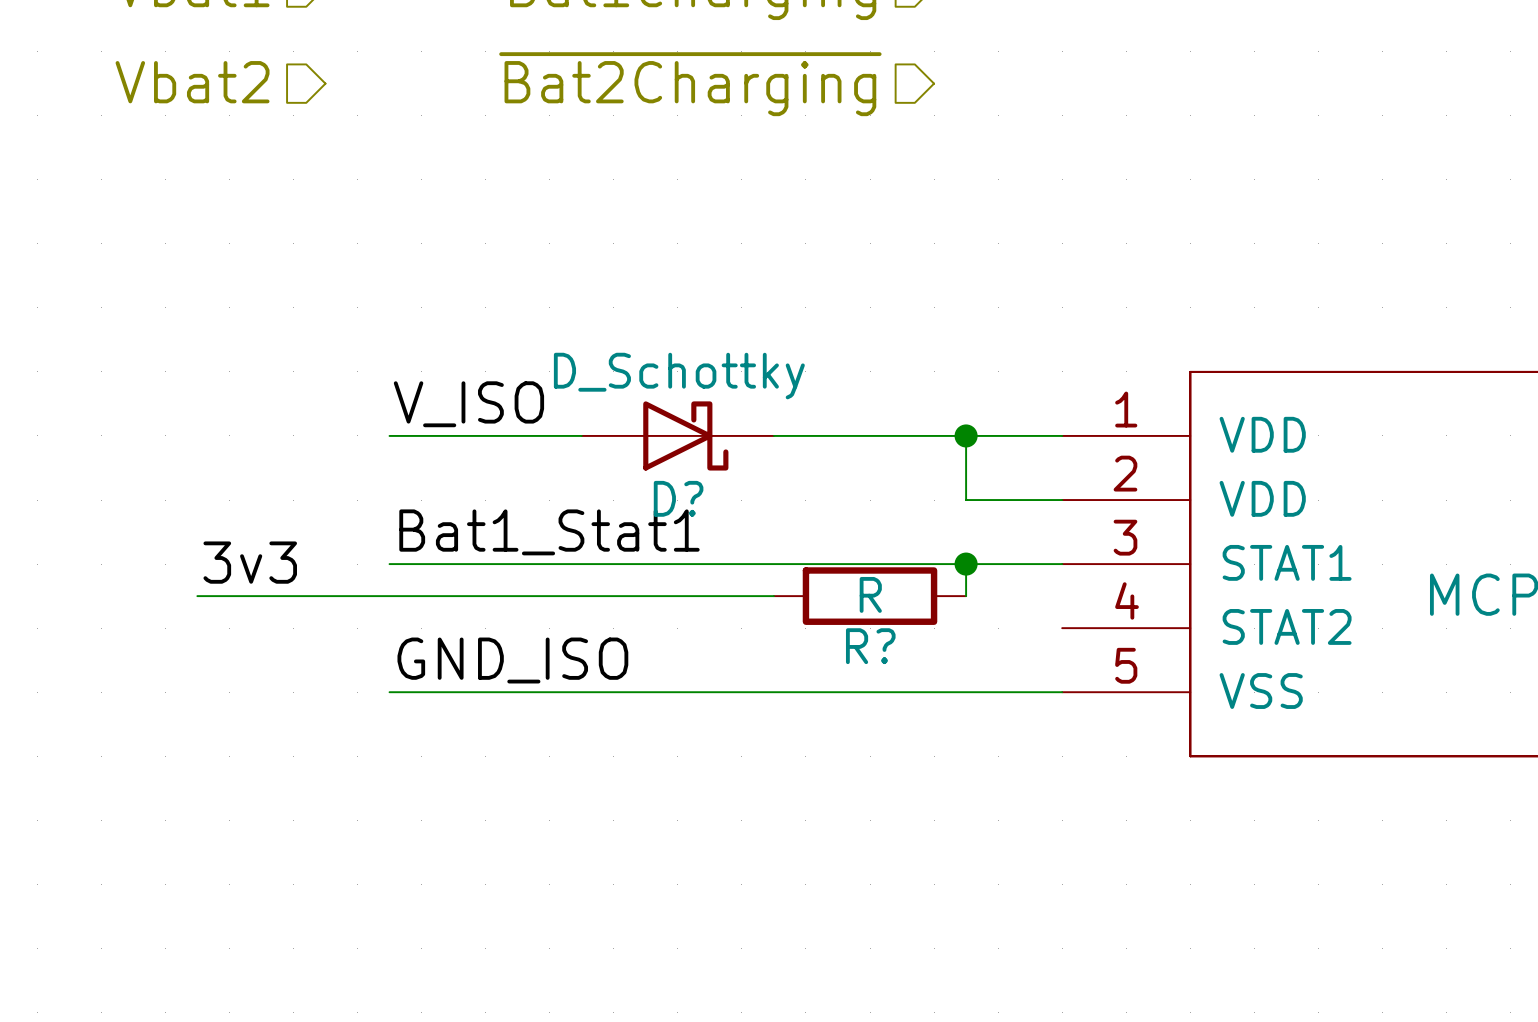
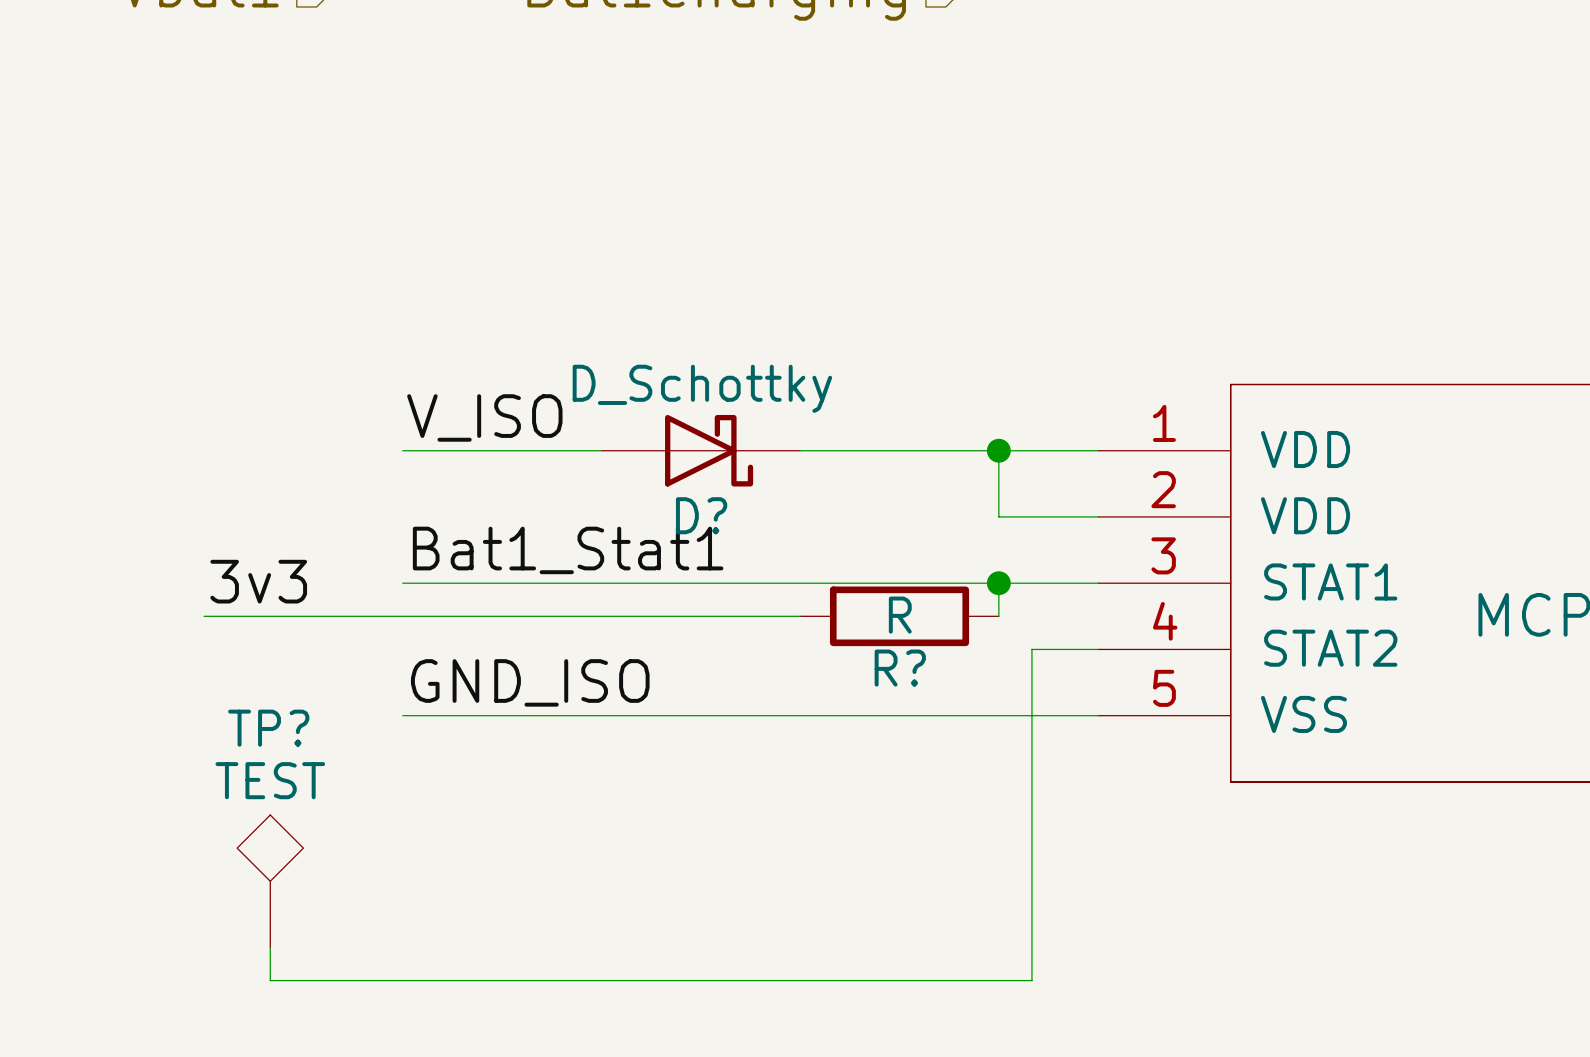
hierarchical label: Vbat2 (192, 82) -> none
hierarchical label: ~{Bat2Charging} (690, 84) -> none
wire: none -> (1098, 649) (1031, 649) (1031, 980) (270, 980) (270, 947)
TP?: none -> TEST (270, 881)

